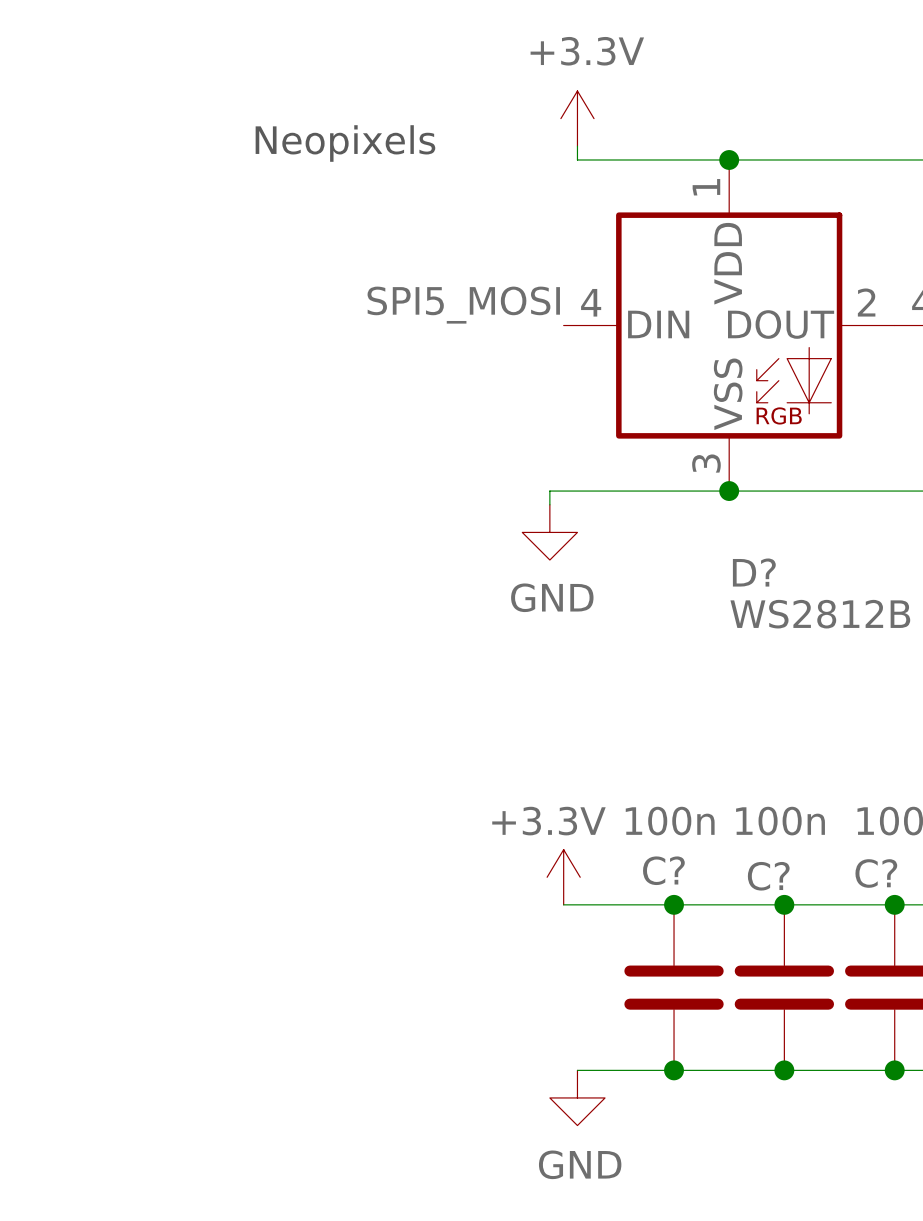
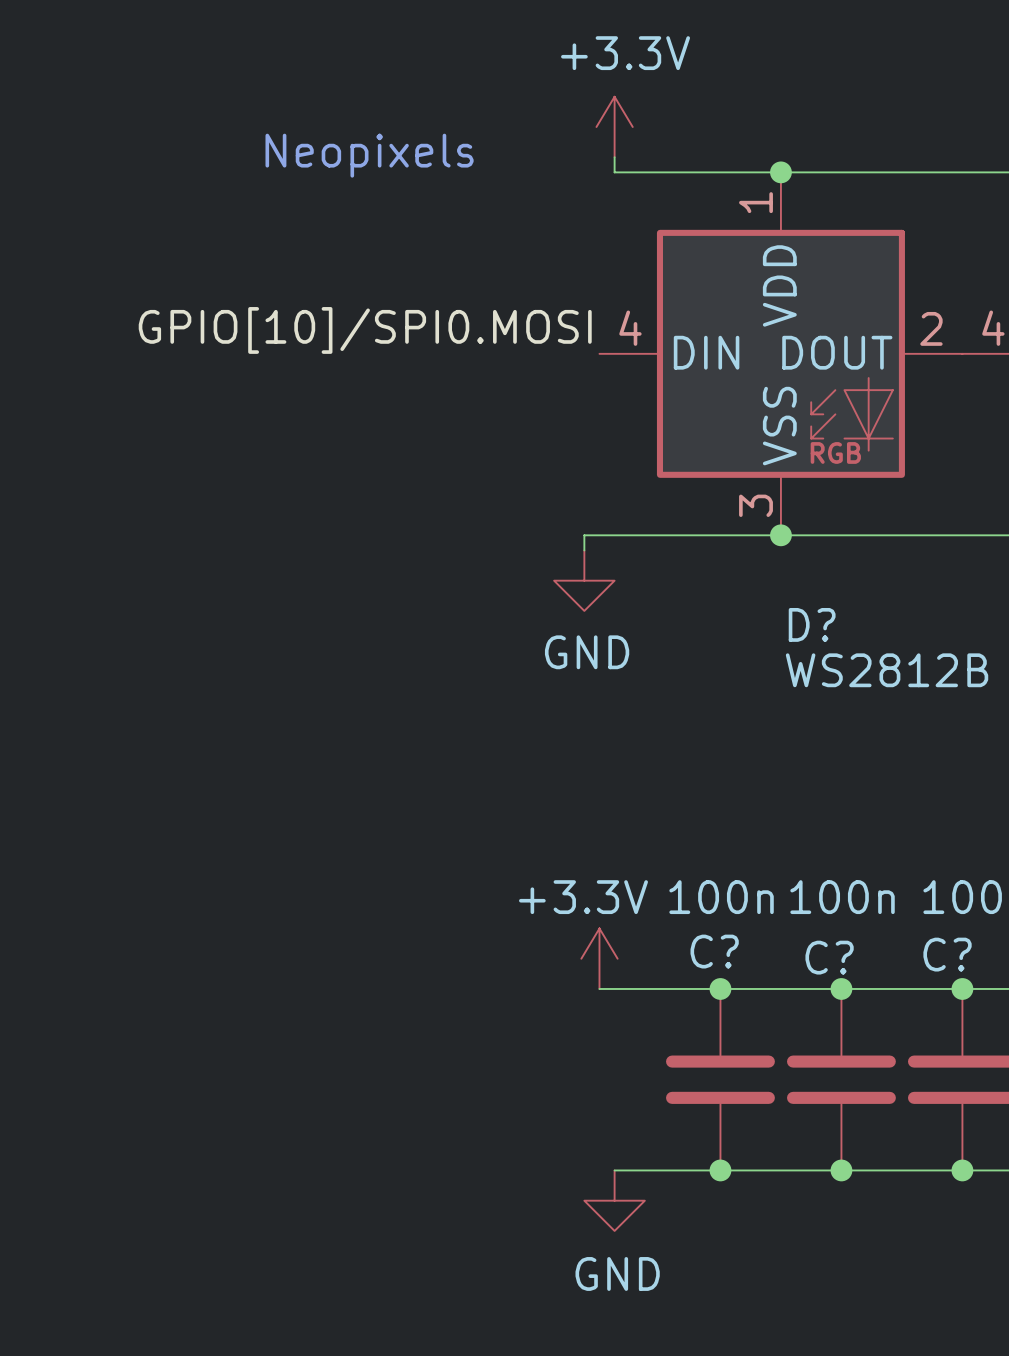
label: SPI5_MOSI (463, 305) -> GPIO[10]/SPI0.MOSI (365, 330)

